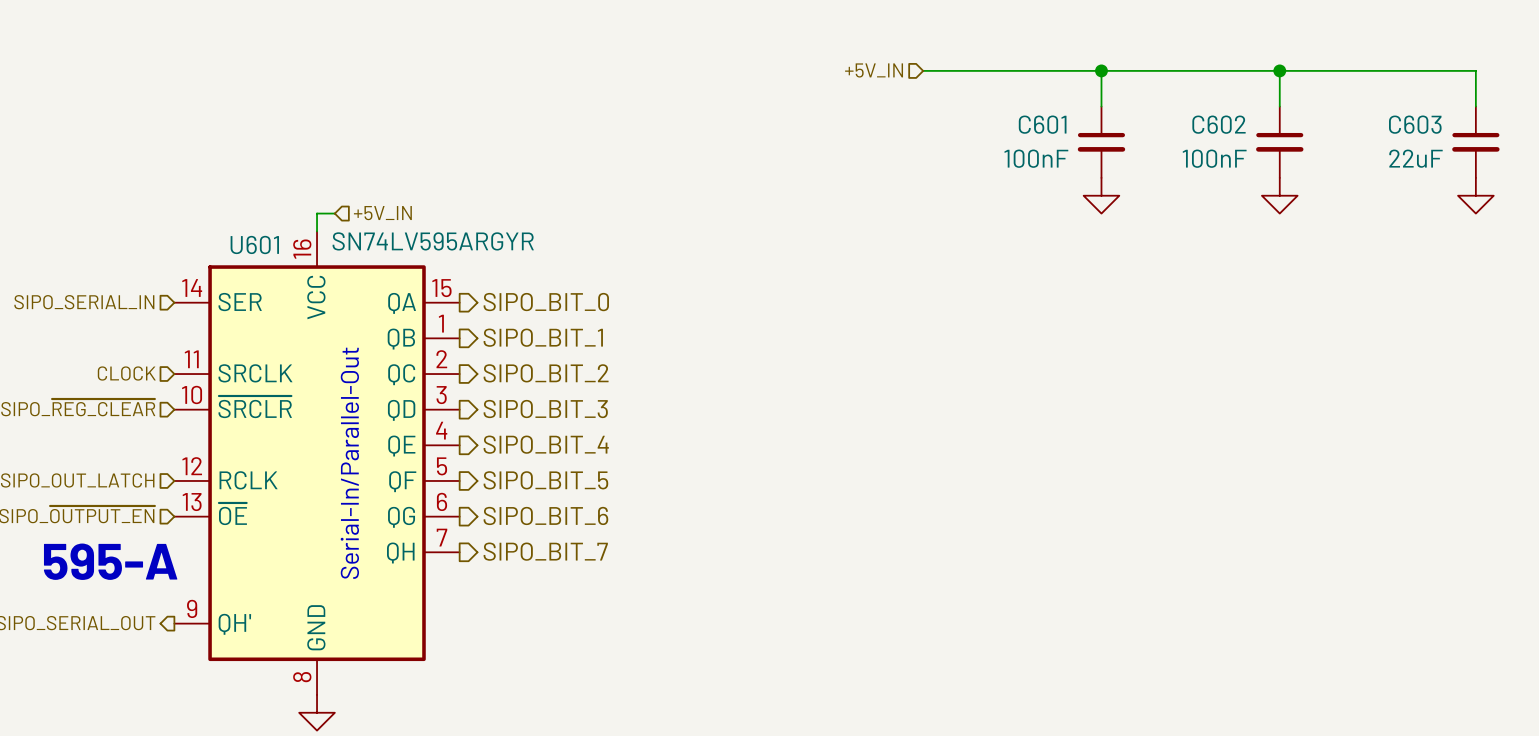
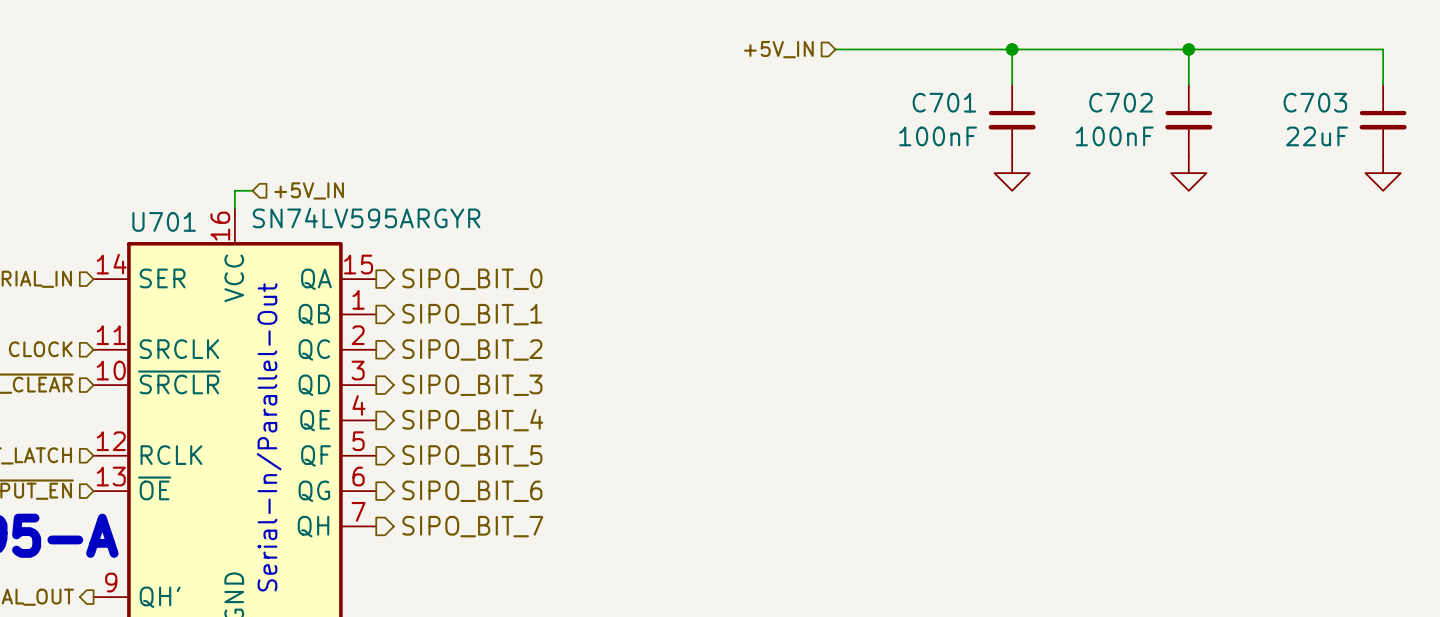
C601 name: C601 (1042, 124) -> C701 (944, 102)
C602 name: C602 (1219, 124) -> C702 (1121, 102)
C603 name: C603 (1415, 124) -> C703 (1315, 102)
U601 name: U601 (254, 244) -> U701 (164, 221)

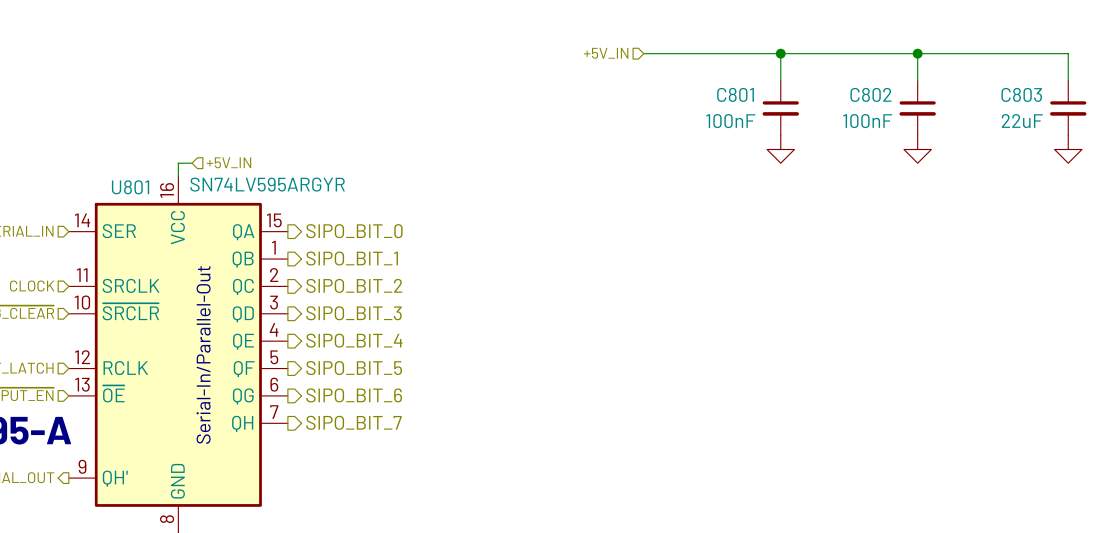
C701 name: C701 (944, 102) -> C801 (735, 94)
C702 name: C702 (1121, 102) -> C802 (870, 94)
C703 name: C703 (1315, 102) -> C803 (1021, 94)
U701 name: U701 (164, 221) -> U801 (130, 187)

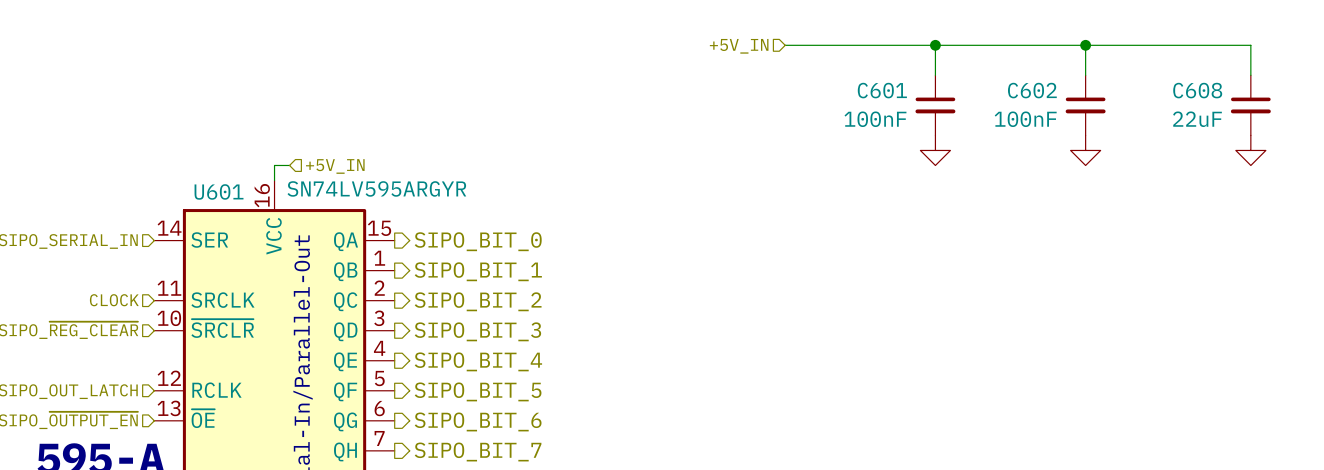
C801 name: C801 (735, 94) -> C601 (882, 90)
C802 name: C802 (870, 94) -> C602 (1032, 90)
C803 name: C803 (1021, 94) -> C608 (1197, 90)
U801 name: U801 (130, 187) -> U601 (219, 191)

